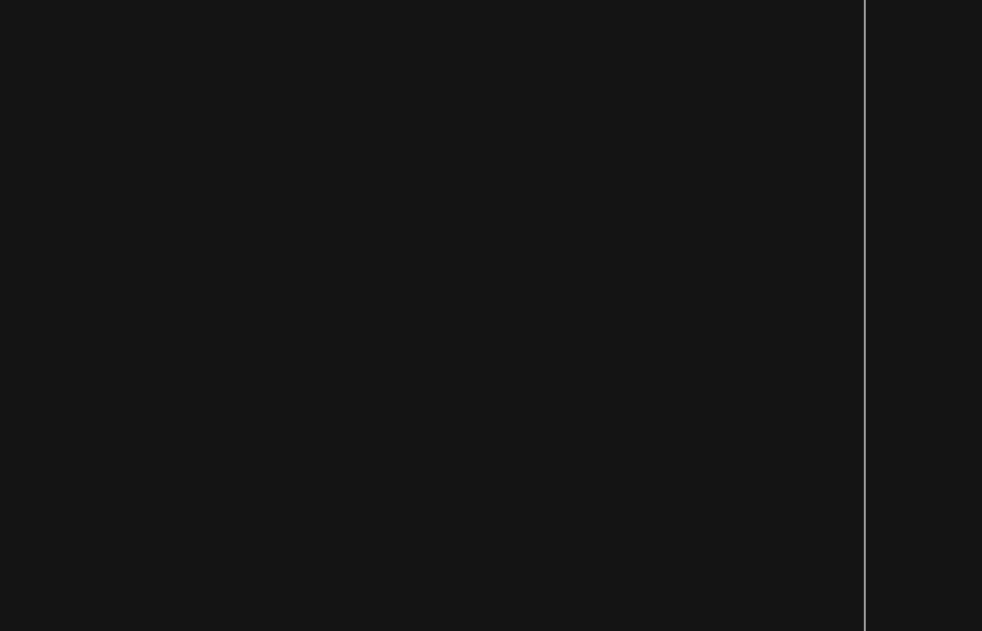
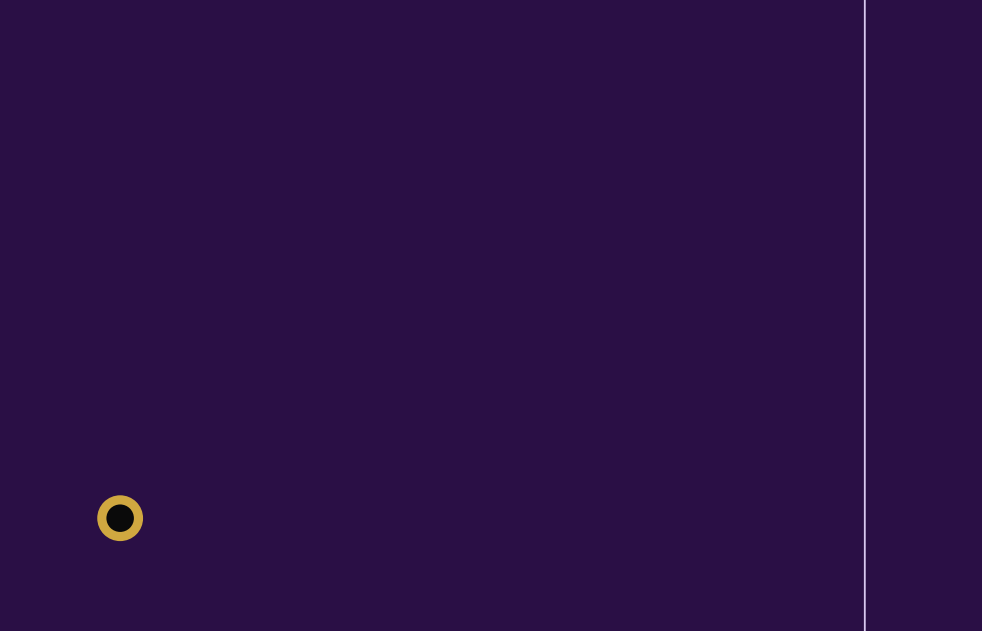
via: none -> (120, 518)

